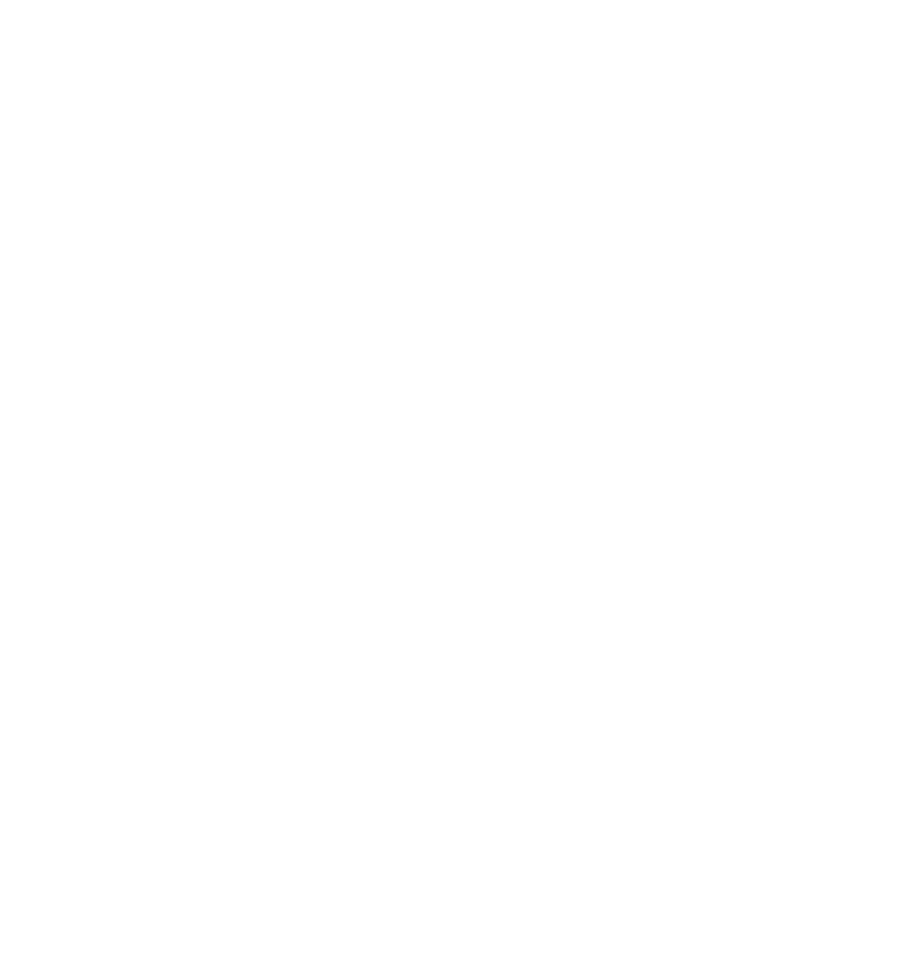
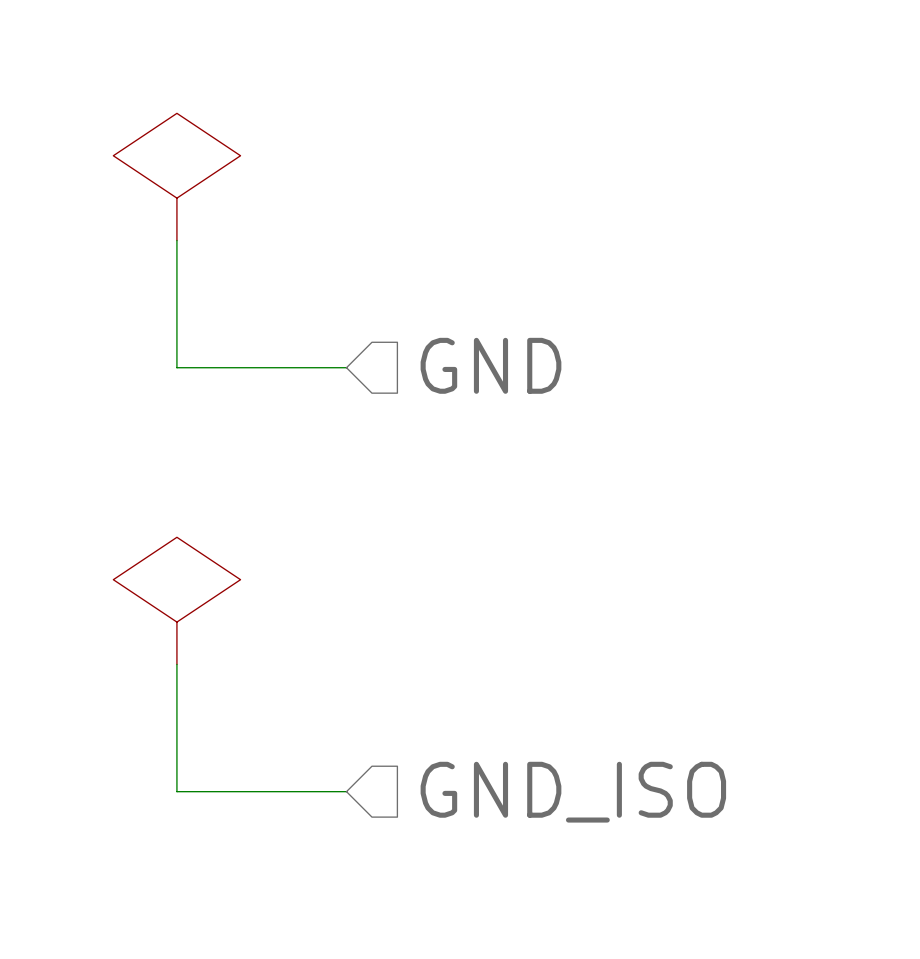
power symbol: none -> (176, 176)
wire: none -> (176, 240) (176, 367) (346, 367)
hierarchical label: none -> GND (490, 365)
power symbol: none -> (176, 600)
wire: none -> (176, 664) (176, 791) (346, 791)
hierarchical label: none -> GND_ISO (573, 792)

